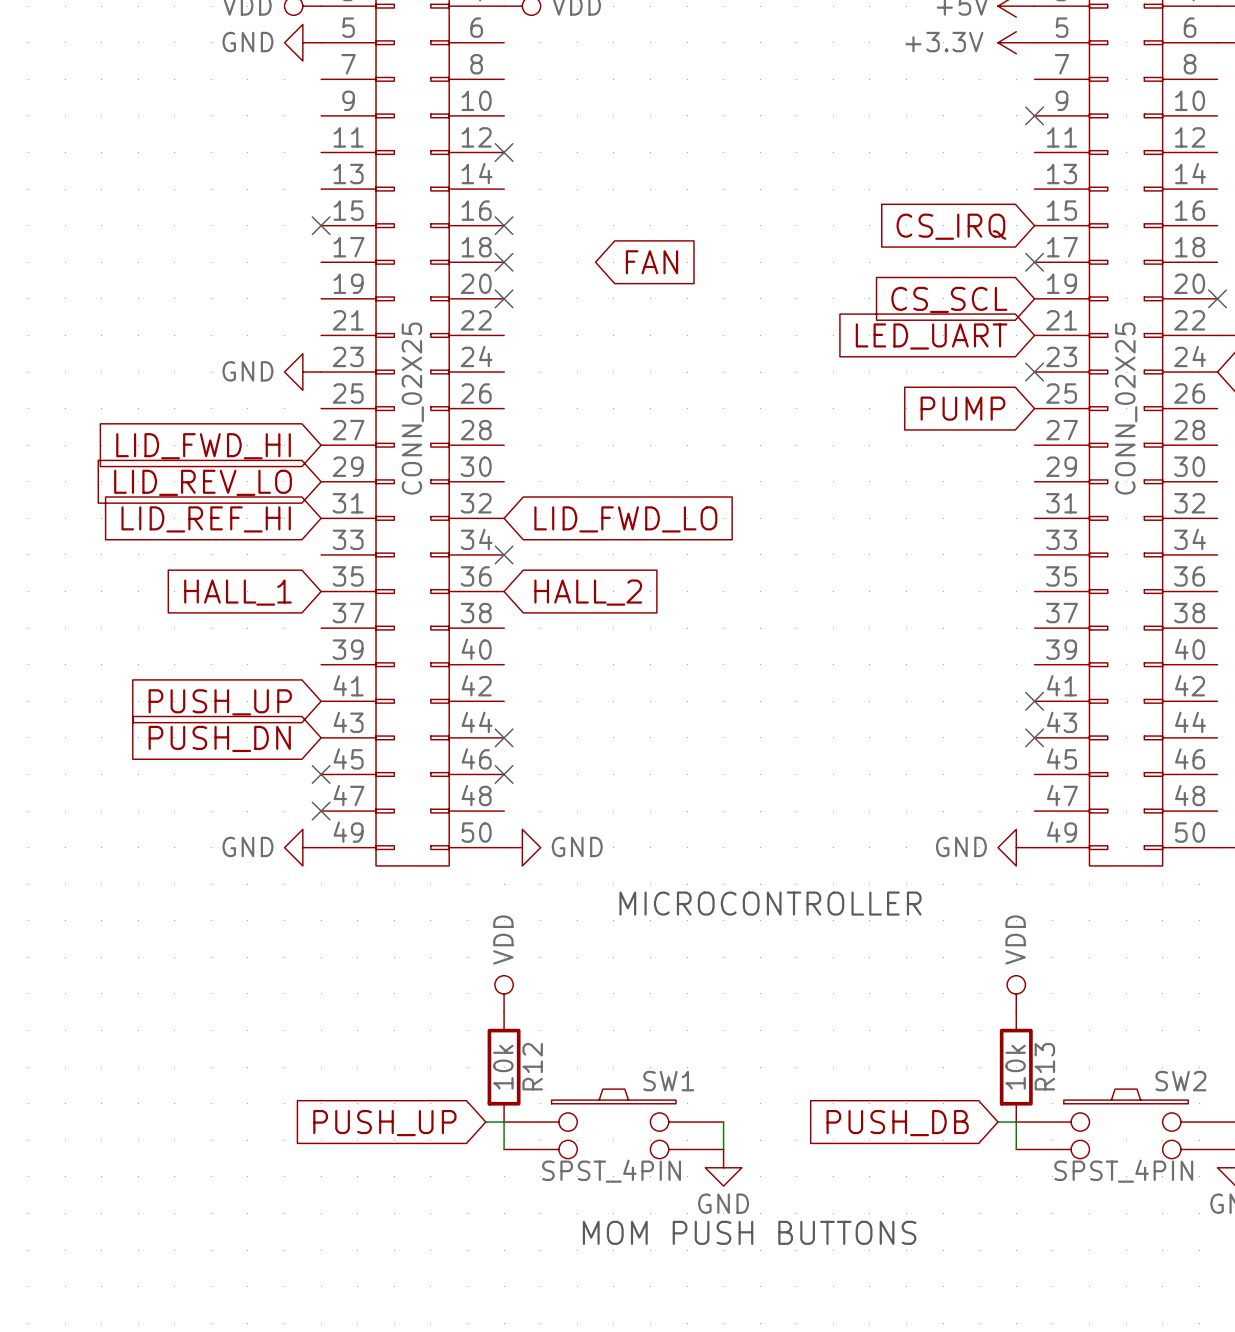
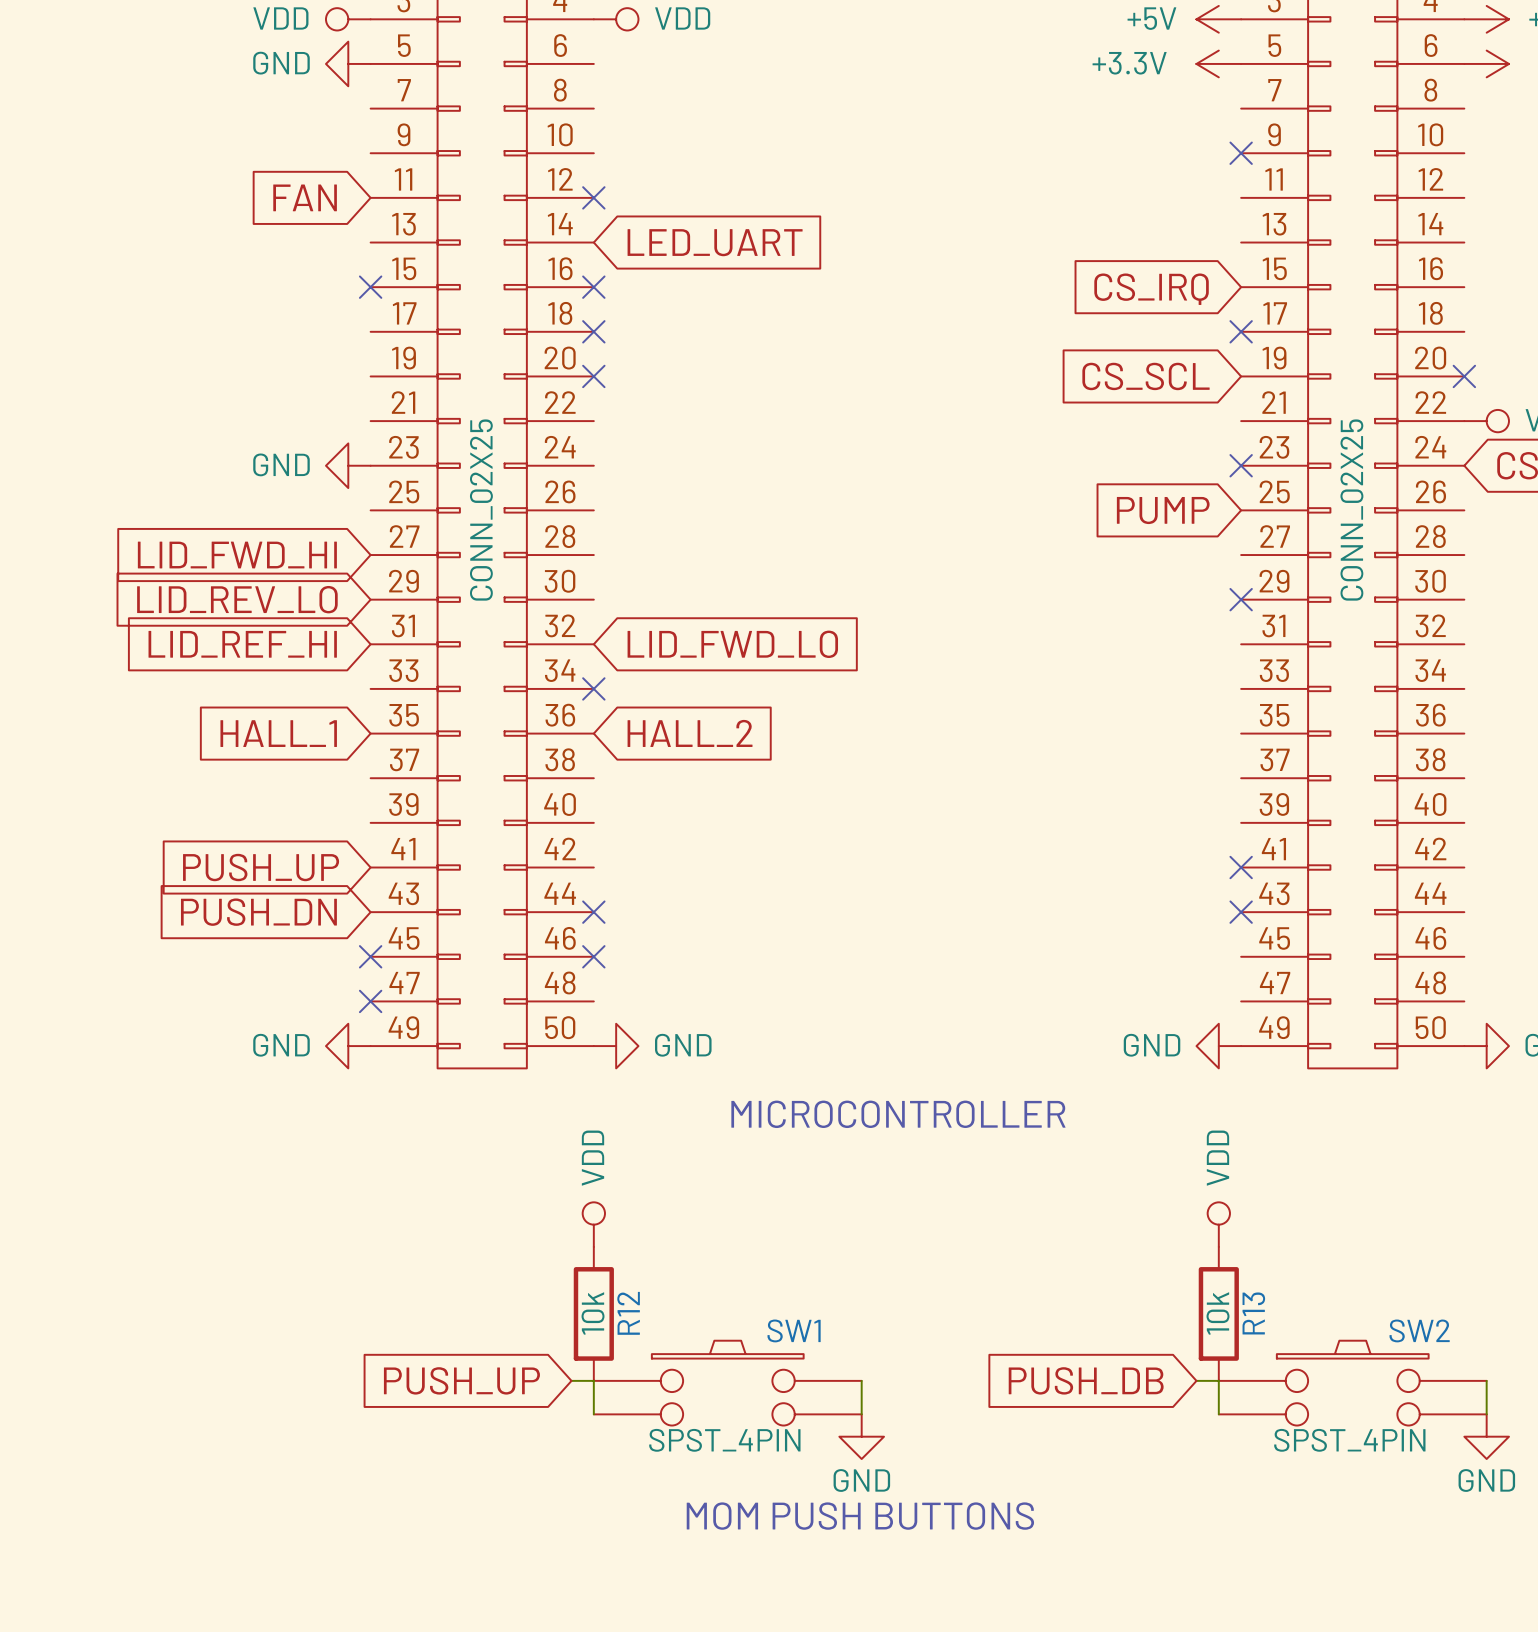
global label: none -> LED_UART (715, 242)
global label rotation: 0° (651, 262) -> 180° (305, 197)
global label position: FAN (651, 262) -> FAN (305, 197)
global label: LED_UART (931, 336) -> none
no-connect mark: none -> (1241, 599)

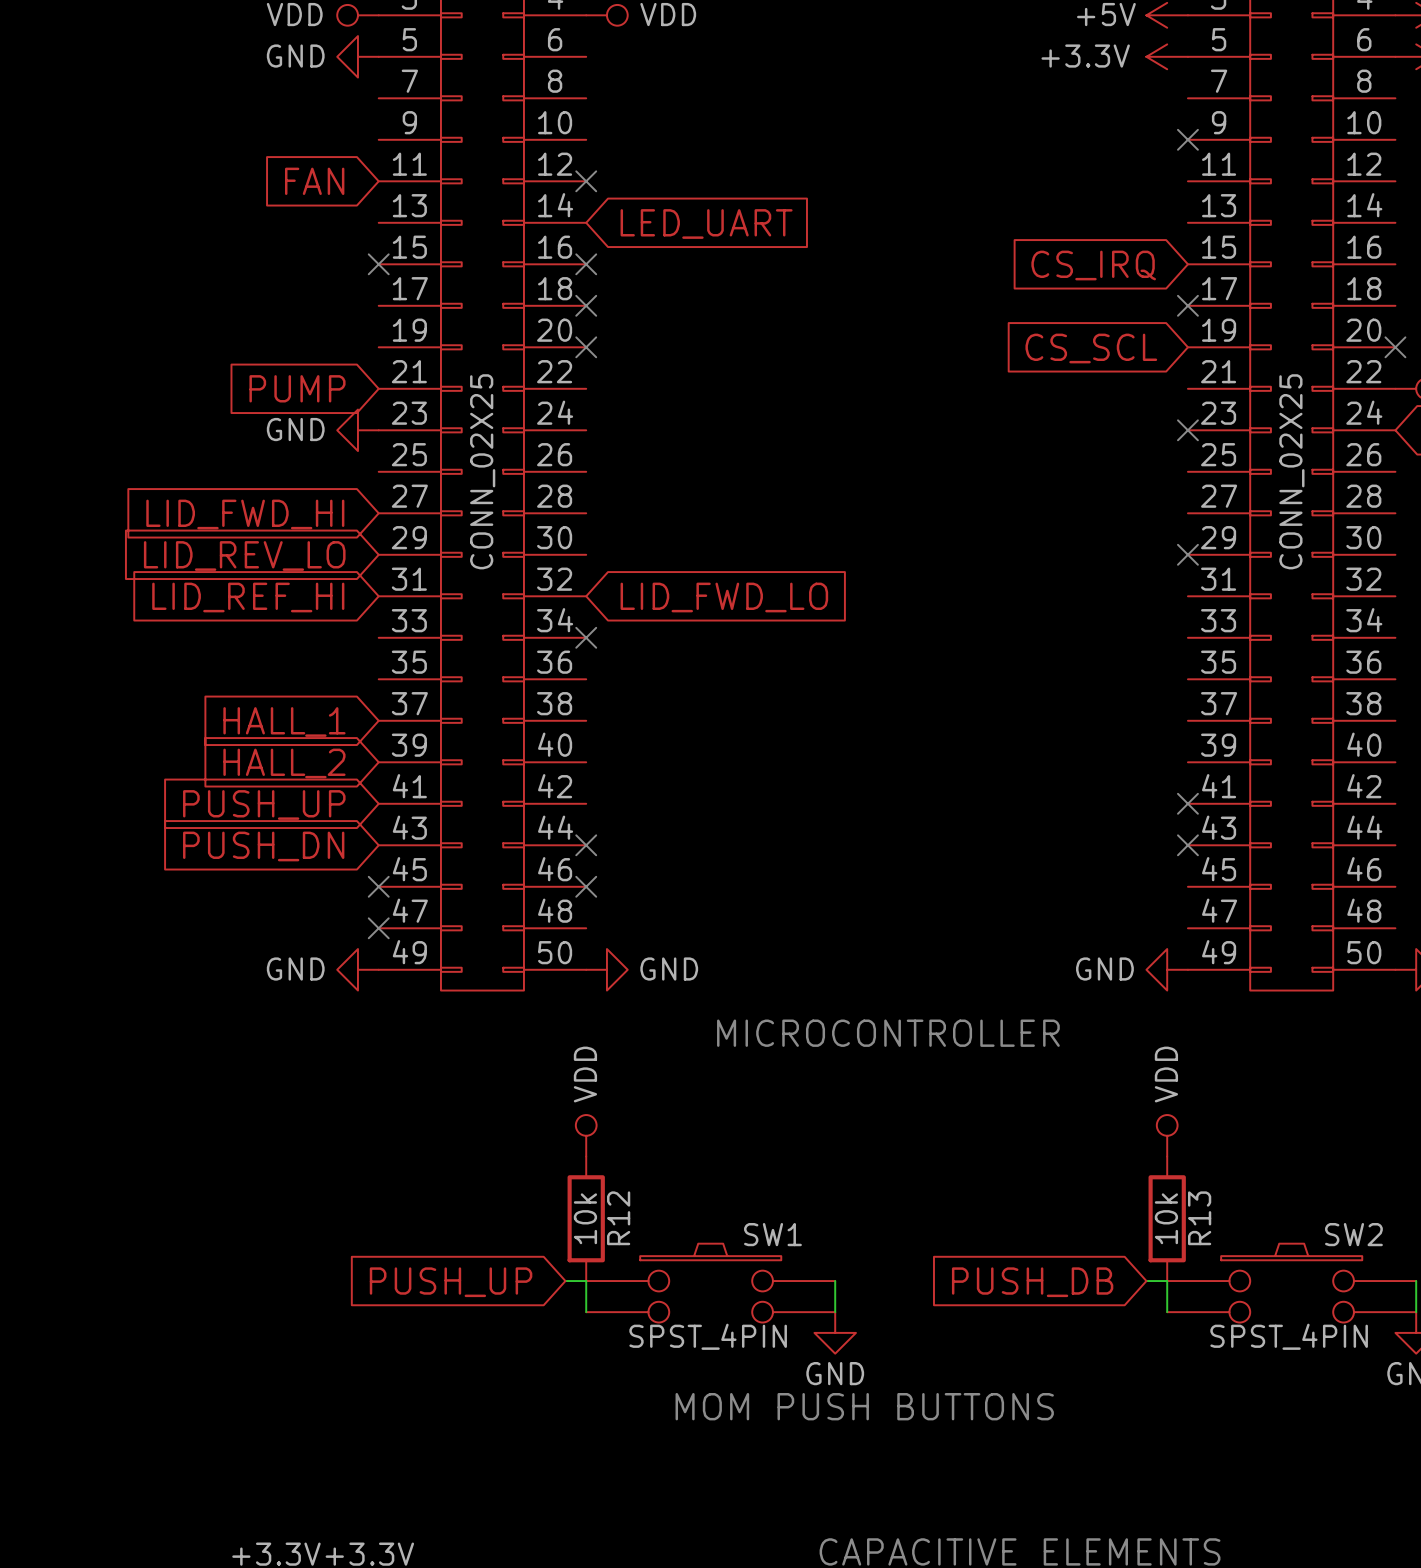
global label: none -> PUMP (297, 388)
global label: PUMP (1163, 510) -> none
global label position: HALL_1 (278, 733) -> HALL_1 (284, 721)
global label rotation: 0° (690, 733) -> 180° (284, 763)
global label position: HALL_2 (690, 733) -> HALL_2 (284, 763)

